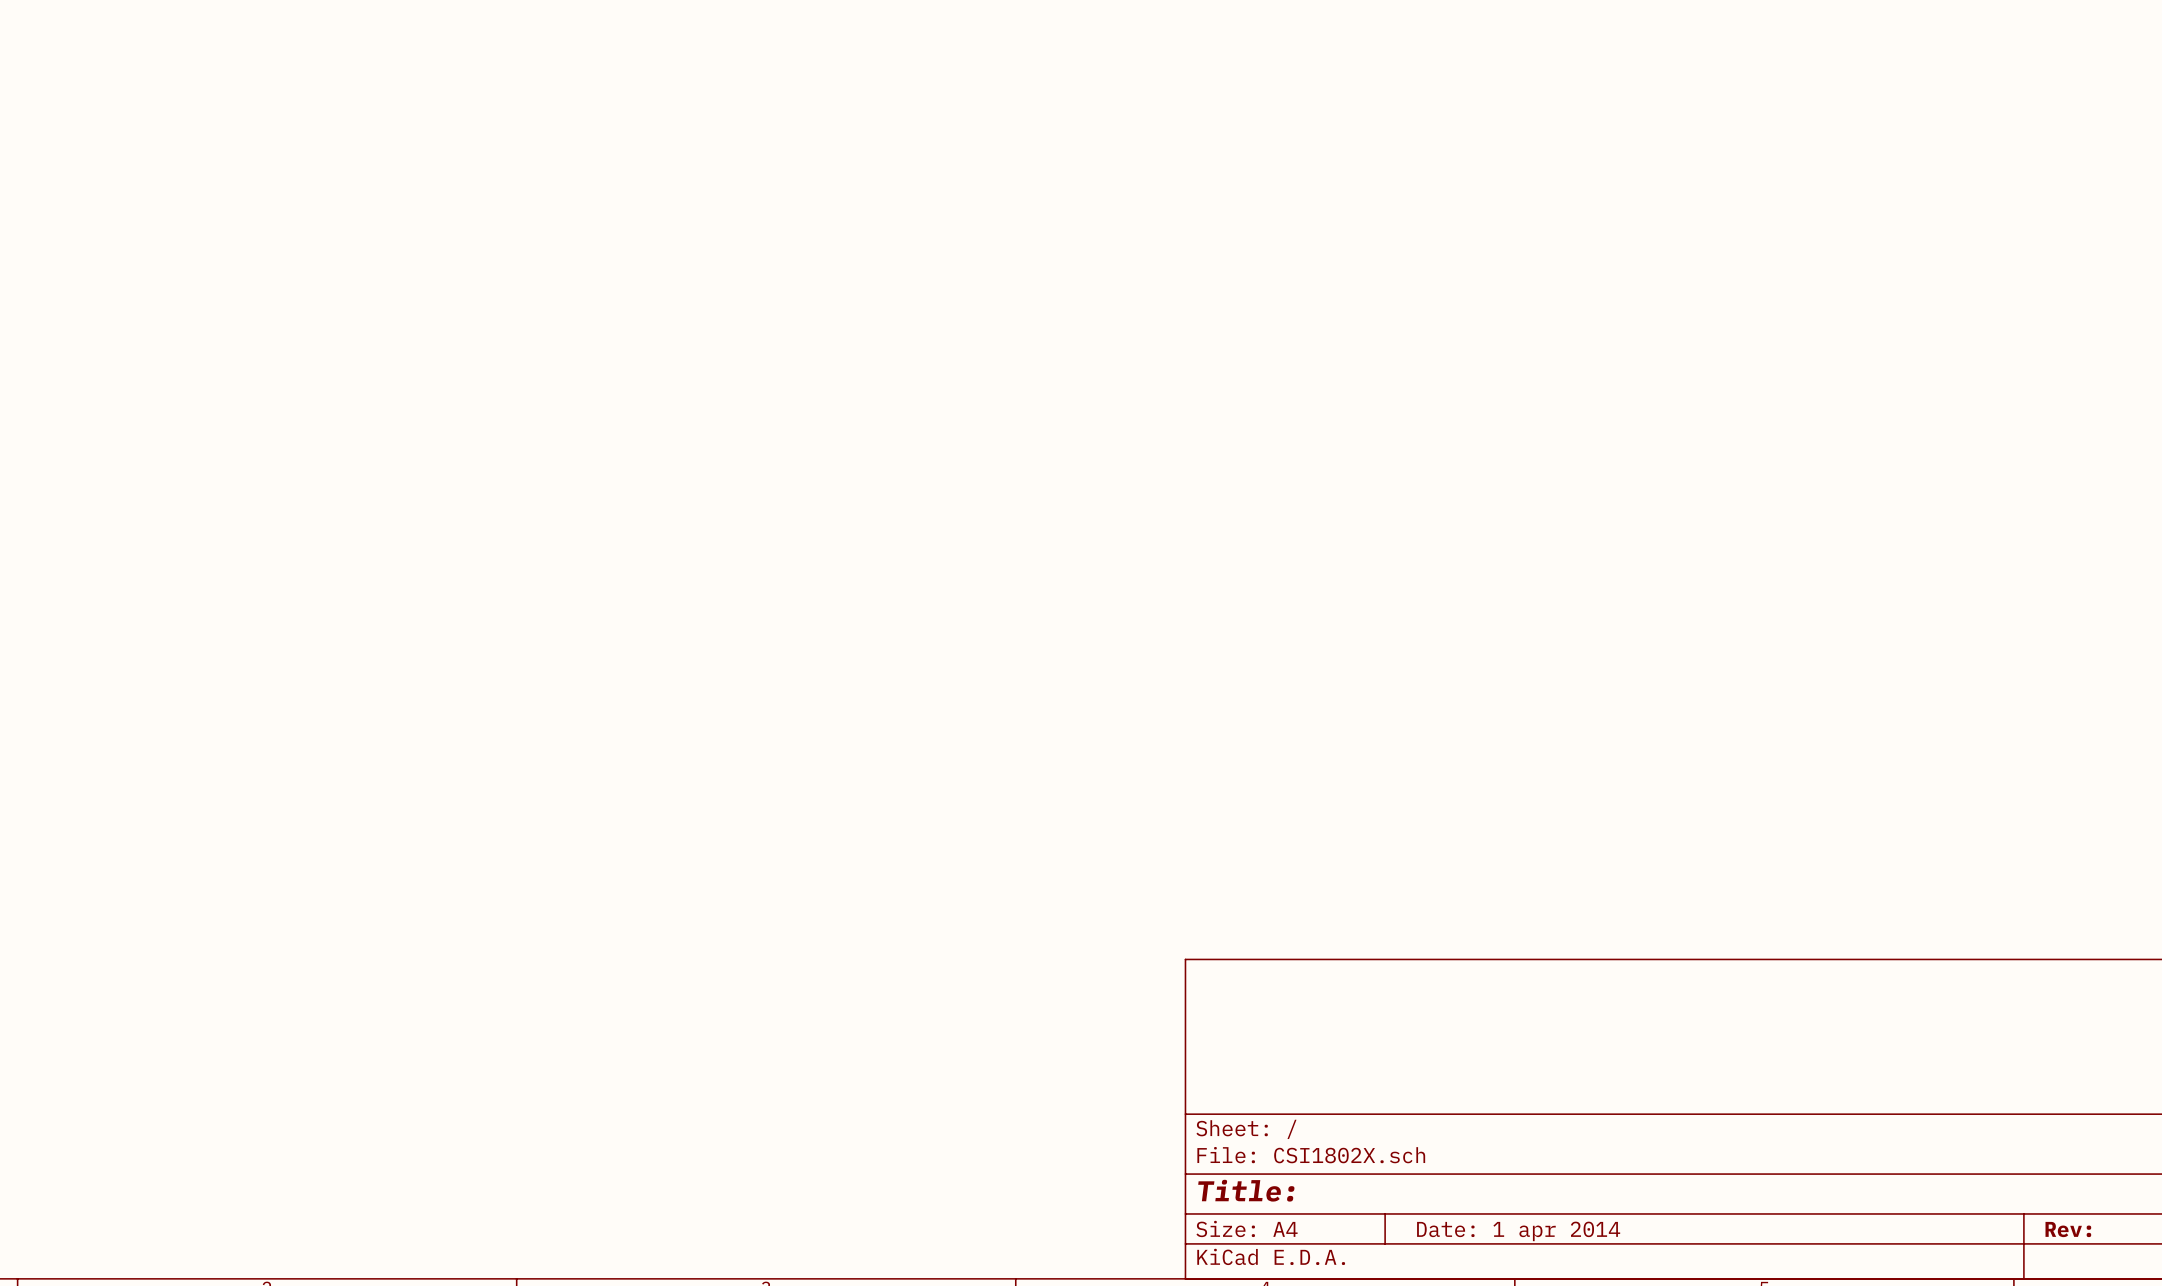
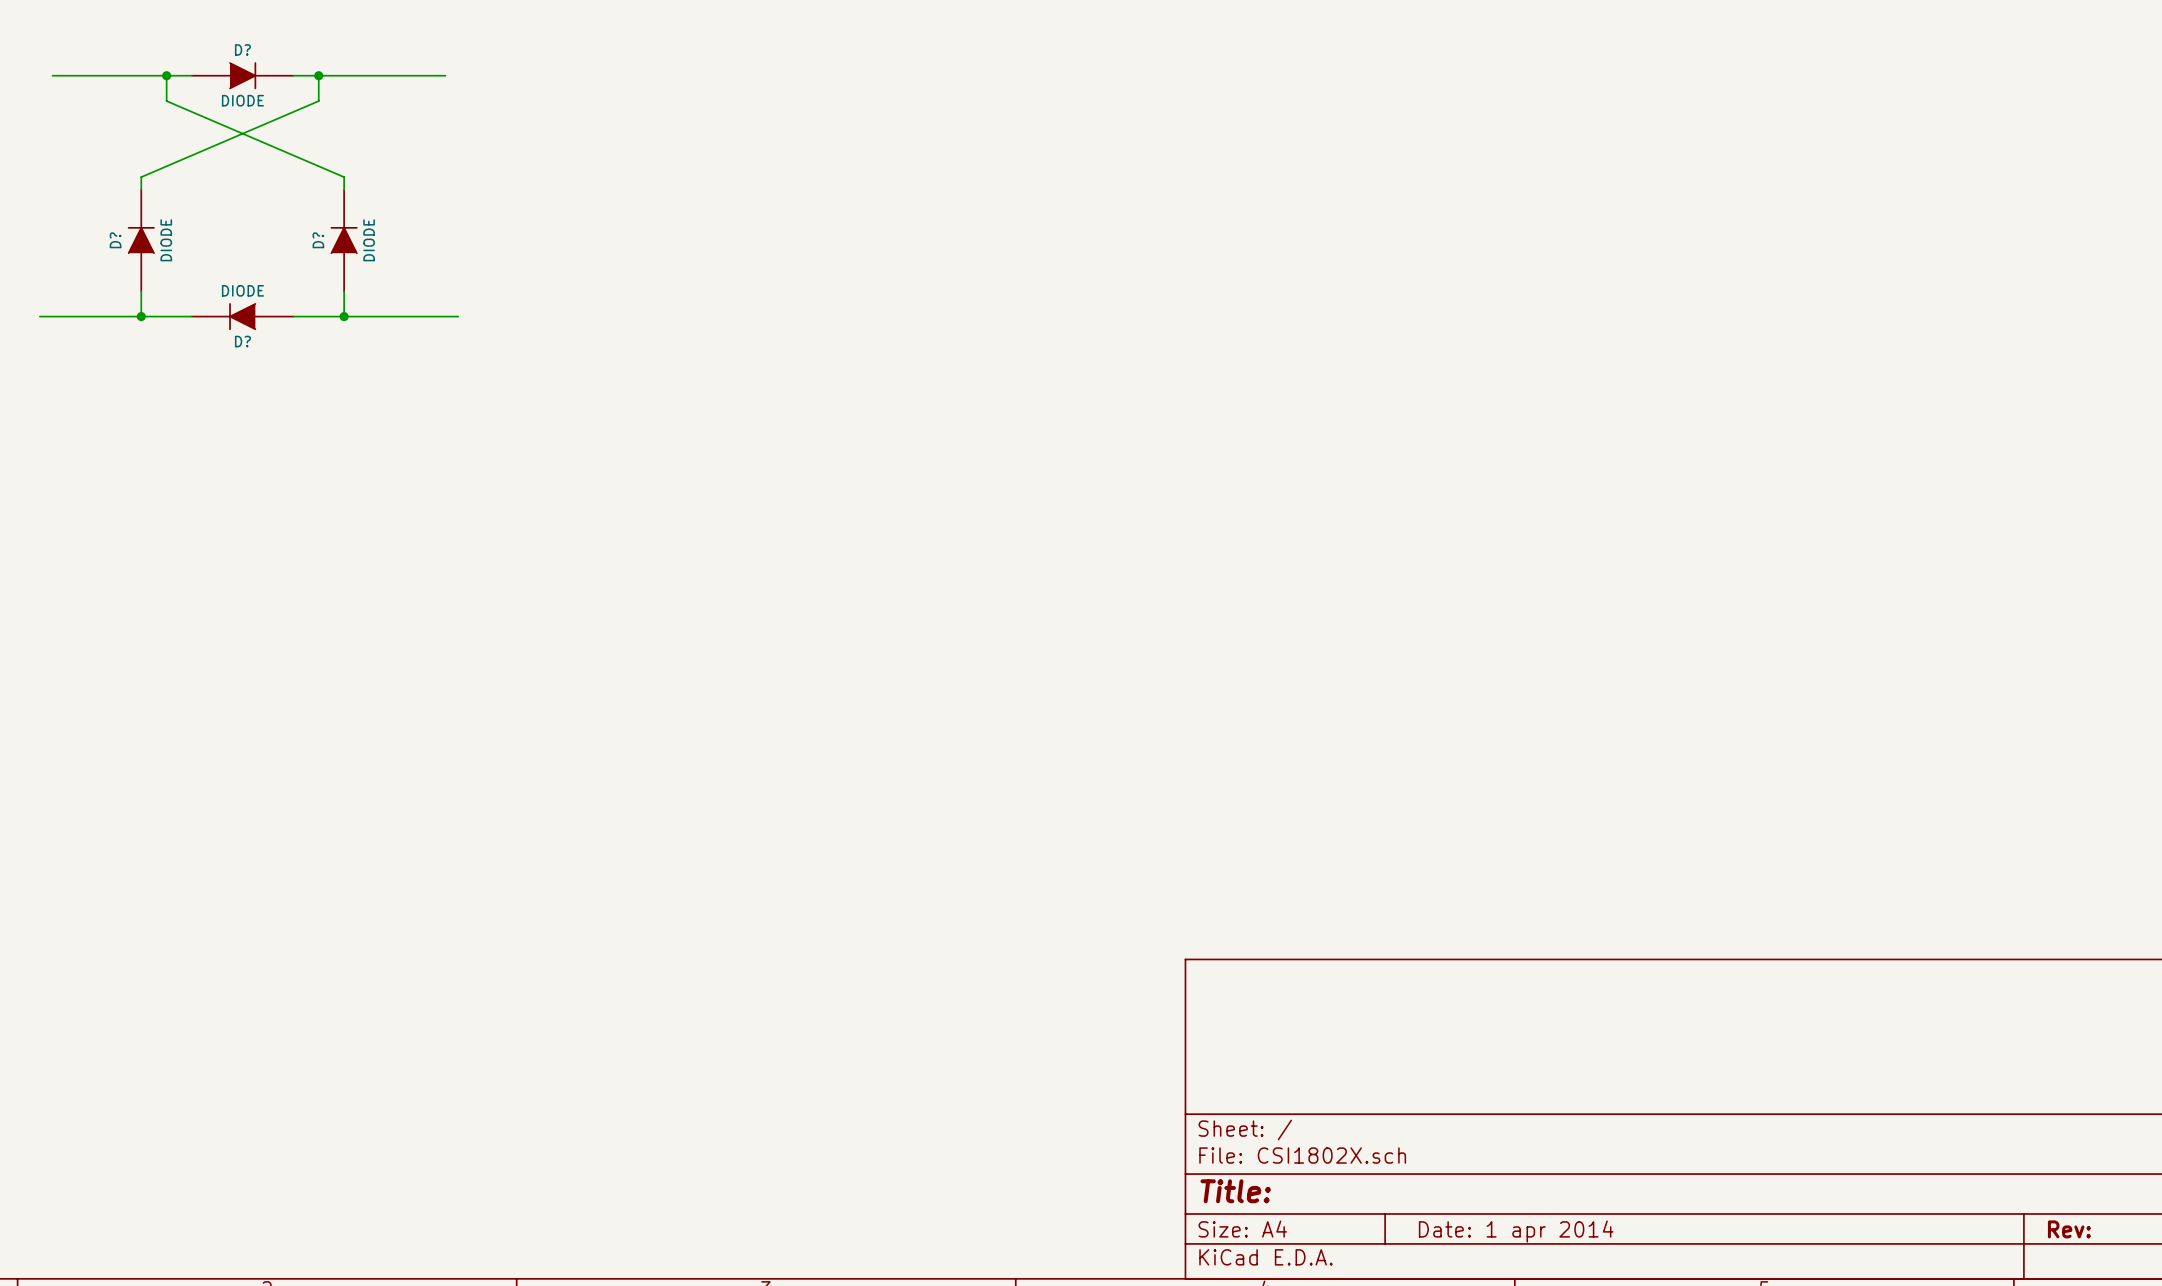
wire: none -> (52, 75) (191, 75)
wire: none -> (166, 75) (166, 101) (344, 177) (344, 189)
junction: none -> (166, 75)
D?: none -> DIODE (242, 75)
wire: none -> (293, 75) (445, 75)
wire: none -> (318, 75) (318, 101) (141, 177) (141, 189)
junction: none -> (318, 75)
D?: none -> DIODE (141, 240)
D?: none -> DIODE (344, 240)
wire: none -> (141, 291) (141, 316)
wire: none -> (344, 291) (344, 316)
wire: none -> (39, 316) (191, 316)
junction: none -> (141, 316)
D?: none -> DIODE (242, 316)
wire: none -> (293, 316) (458, 316)
junction: none -> (344, 316)

